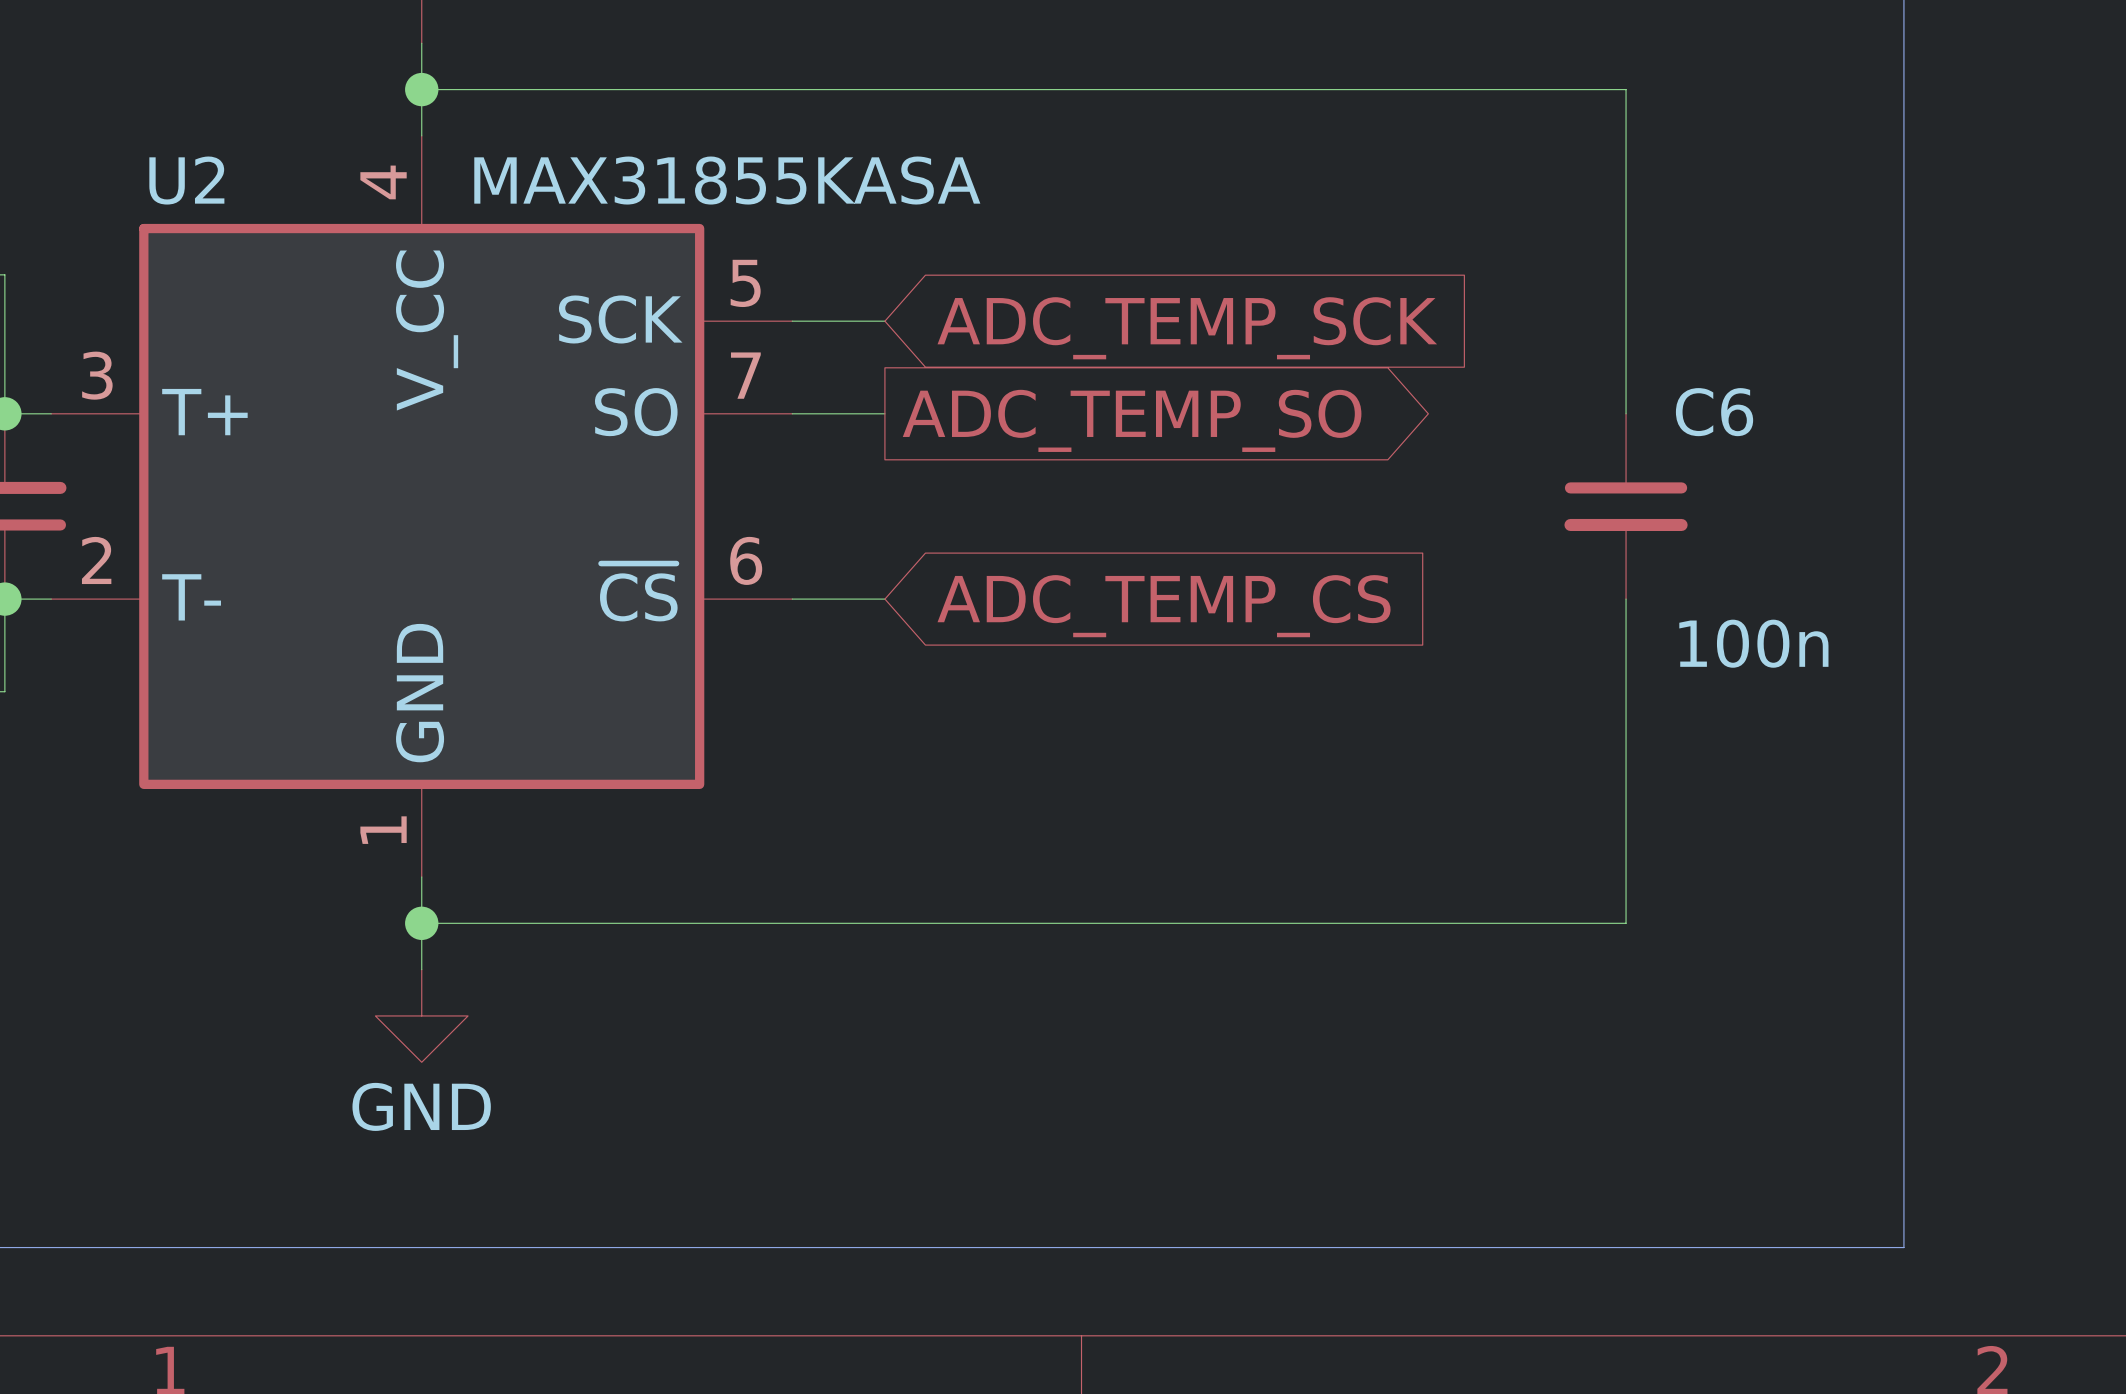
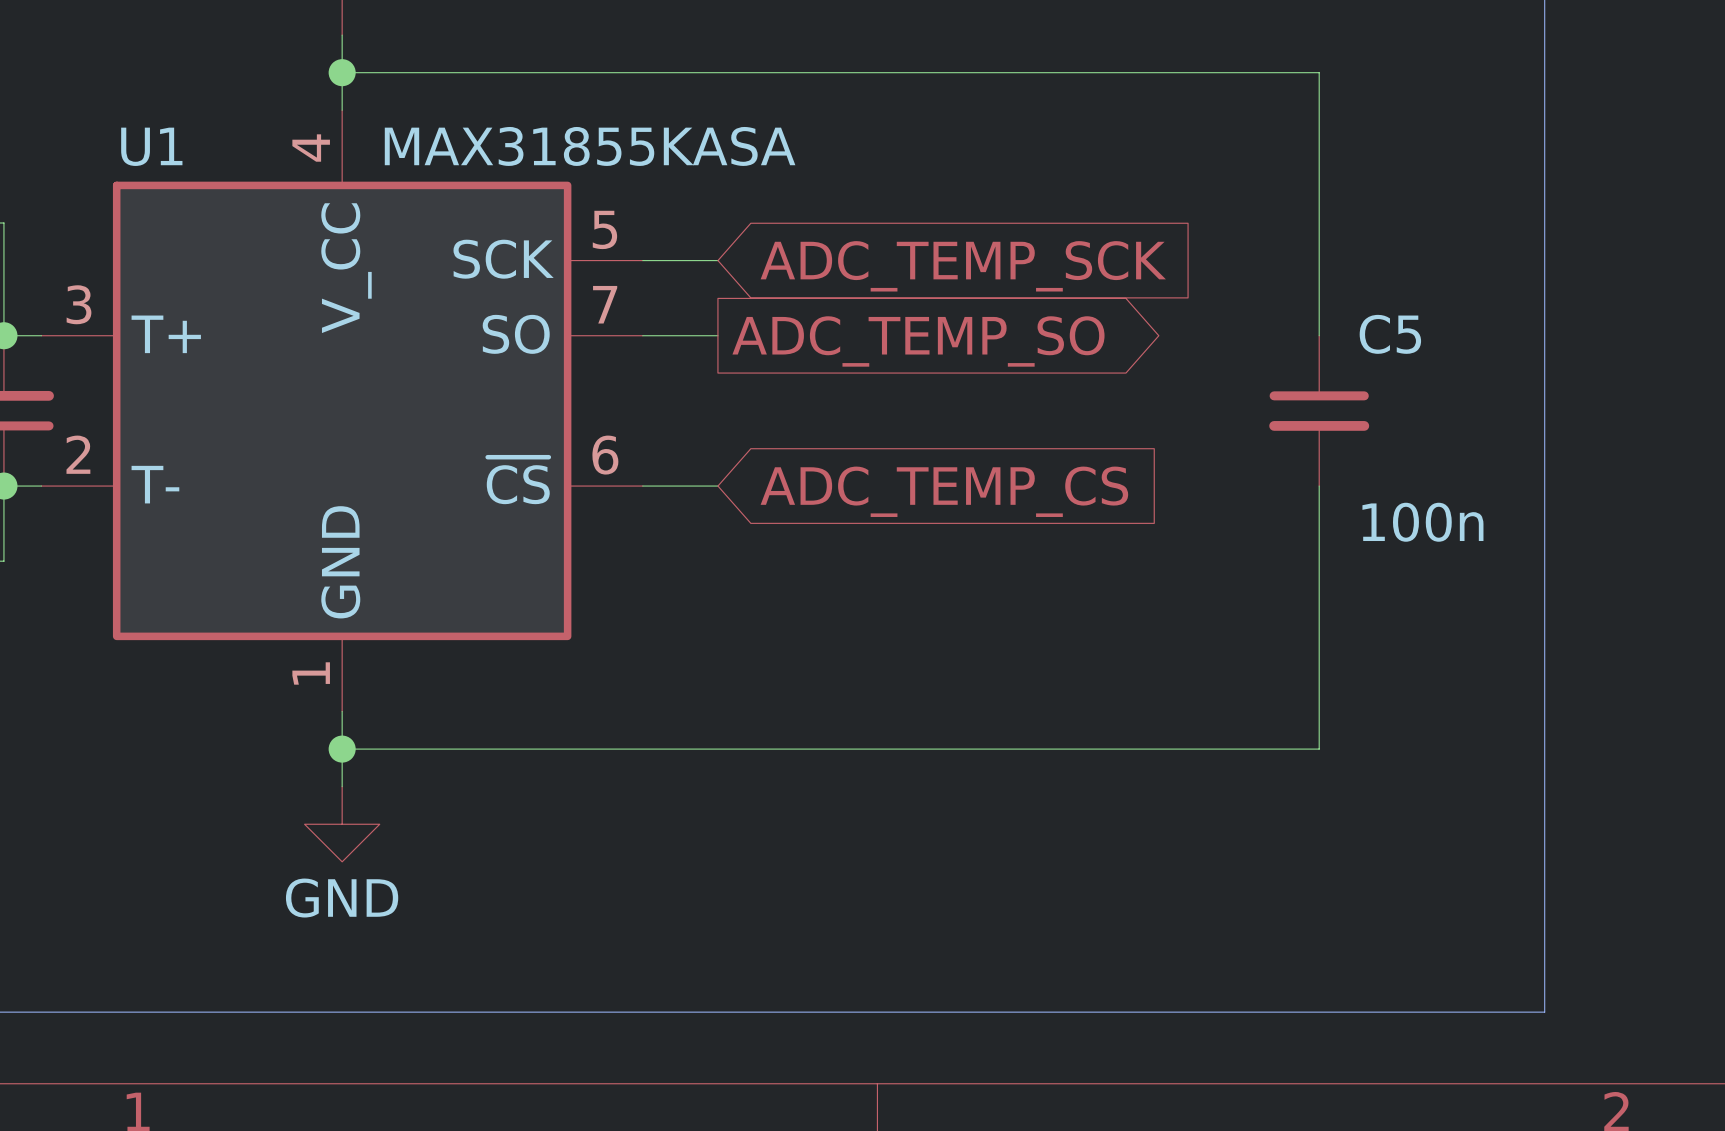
U2 name: U2 (186, 180) -> U1 (151, 146)
C6 name: C6 (1714, 412) -> C5 (1390, 334)

